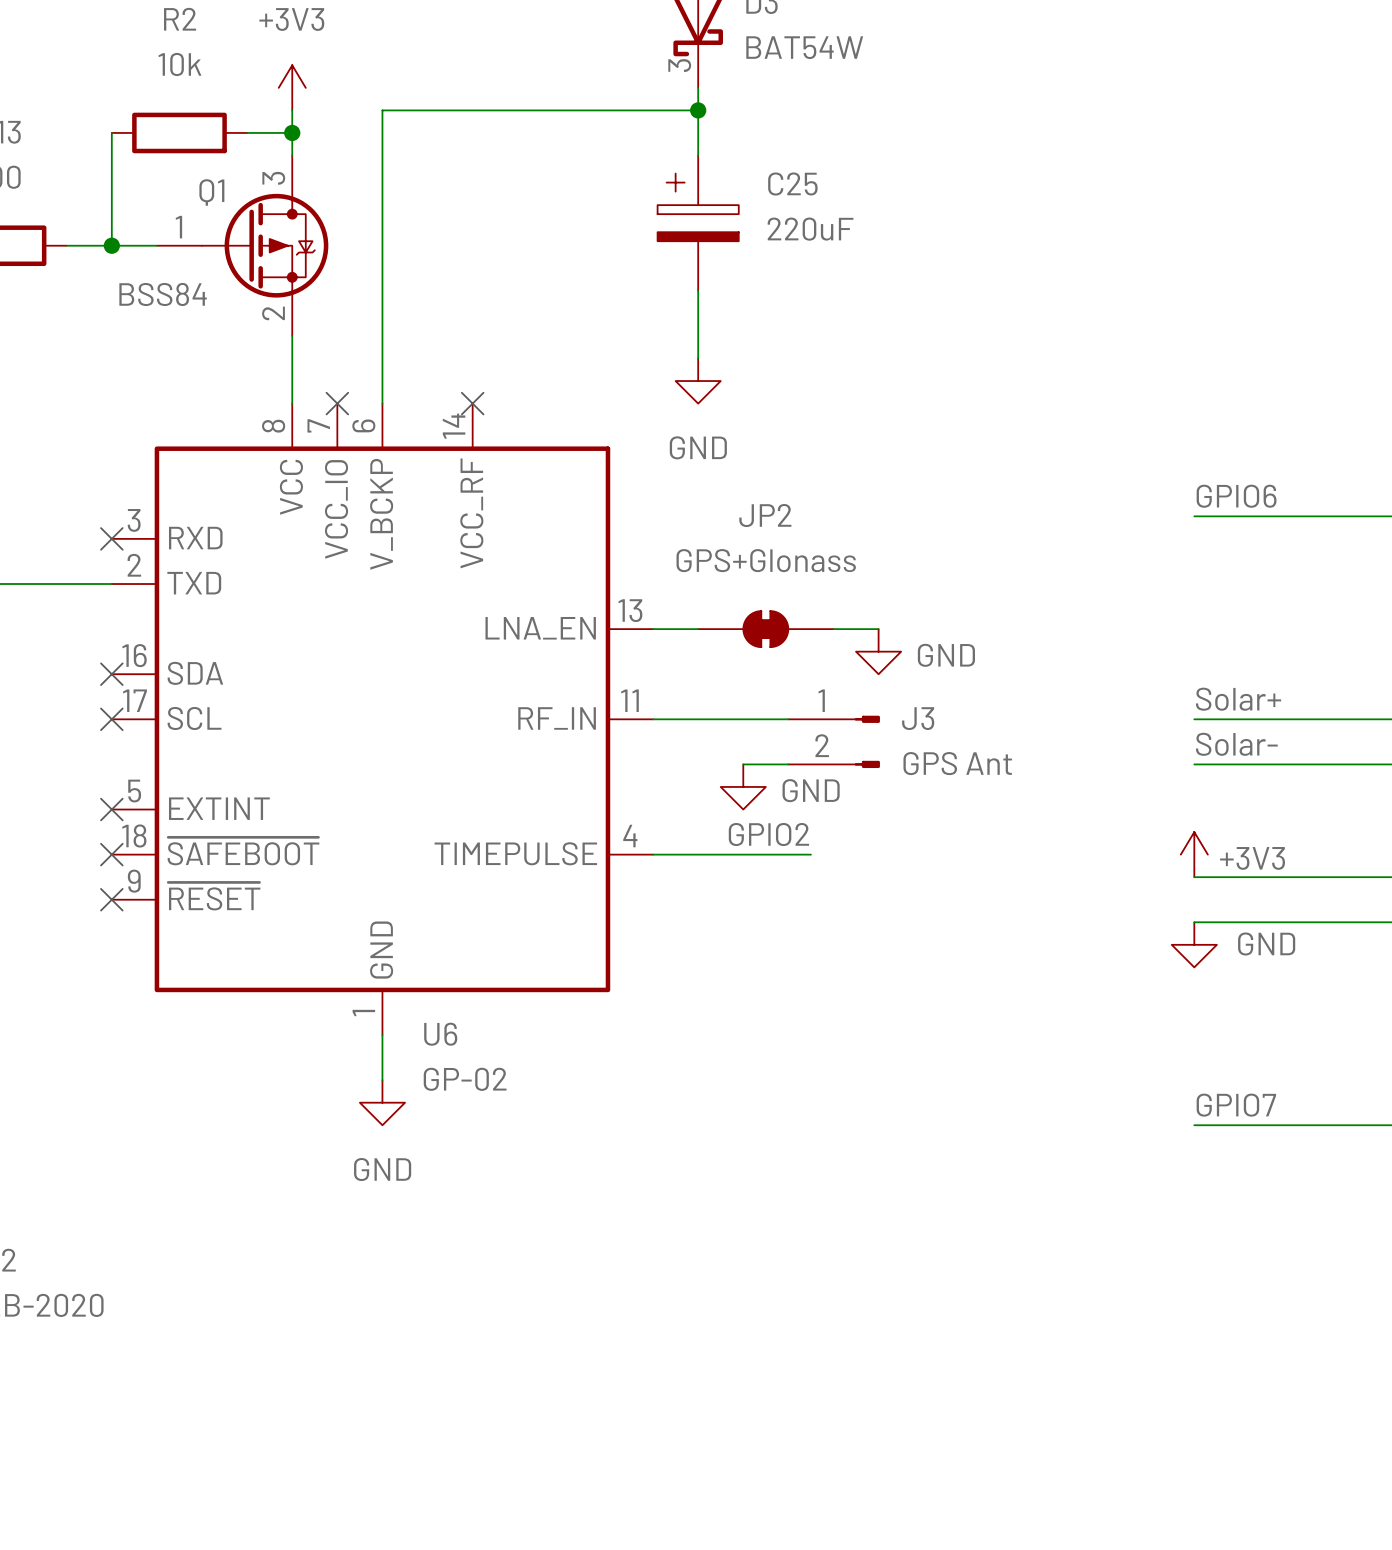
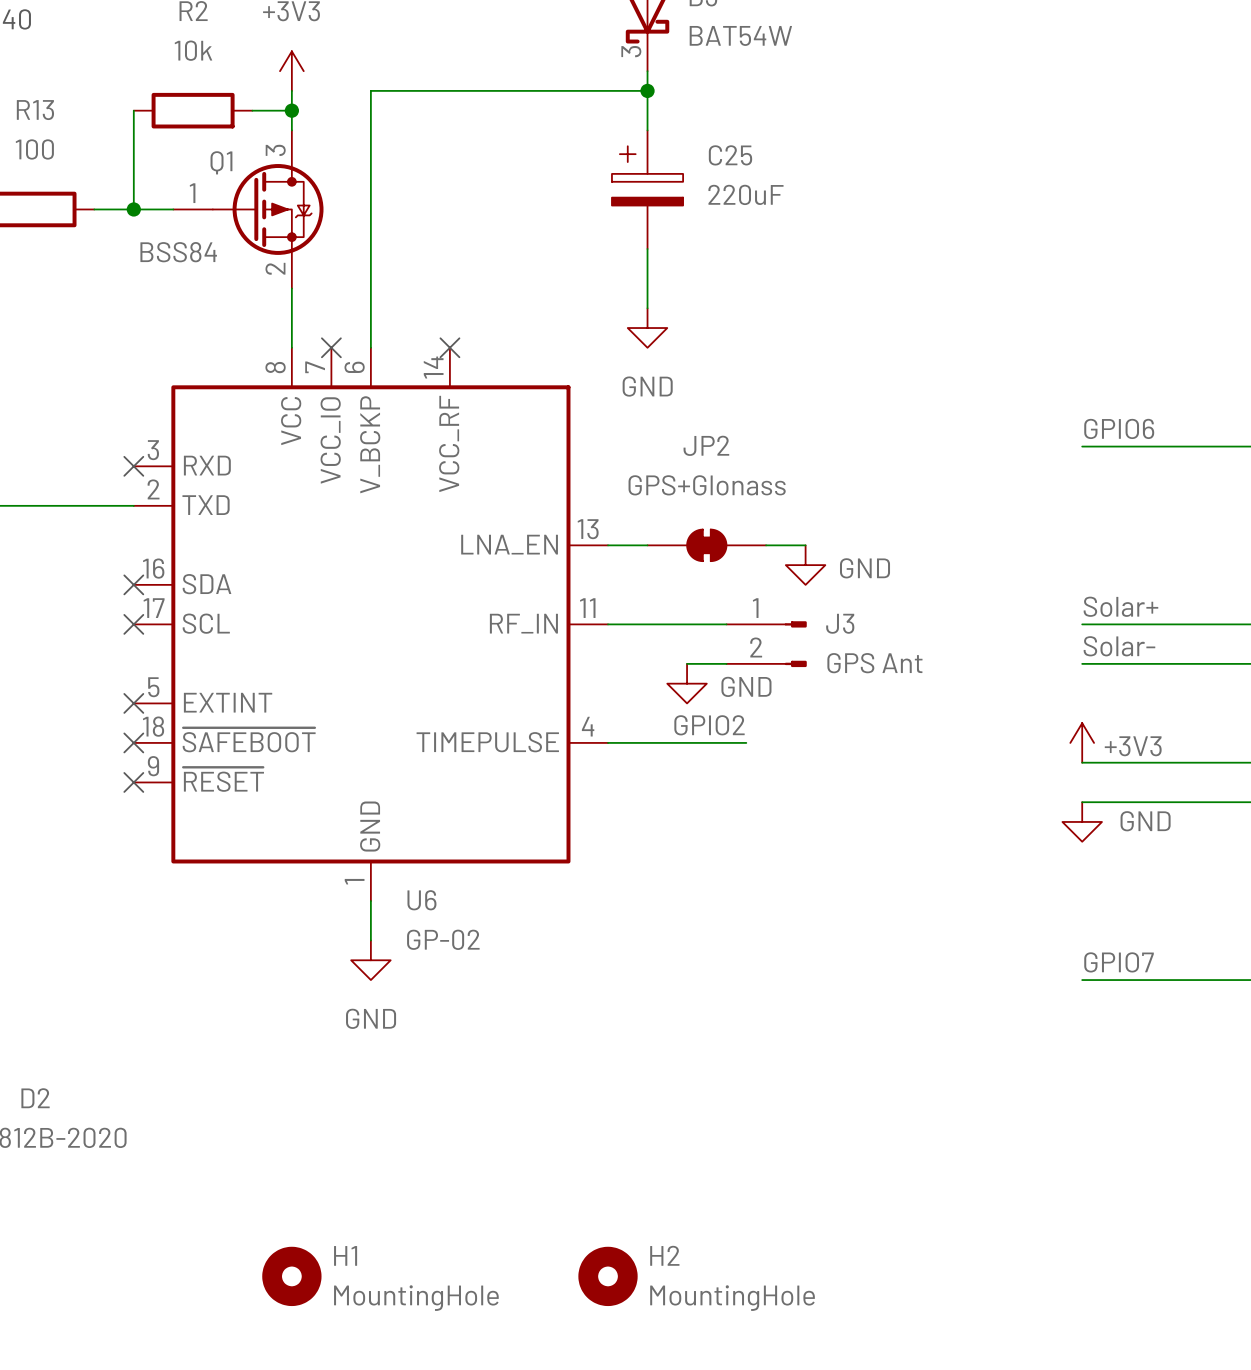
H1: none -> MountingHole (291, 1276)
H2: none -> MountingHole (608, 1276)

